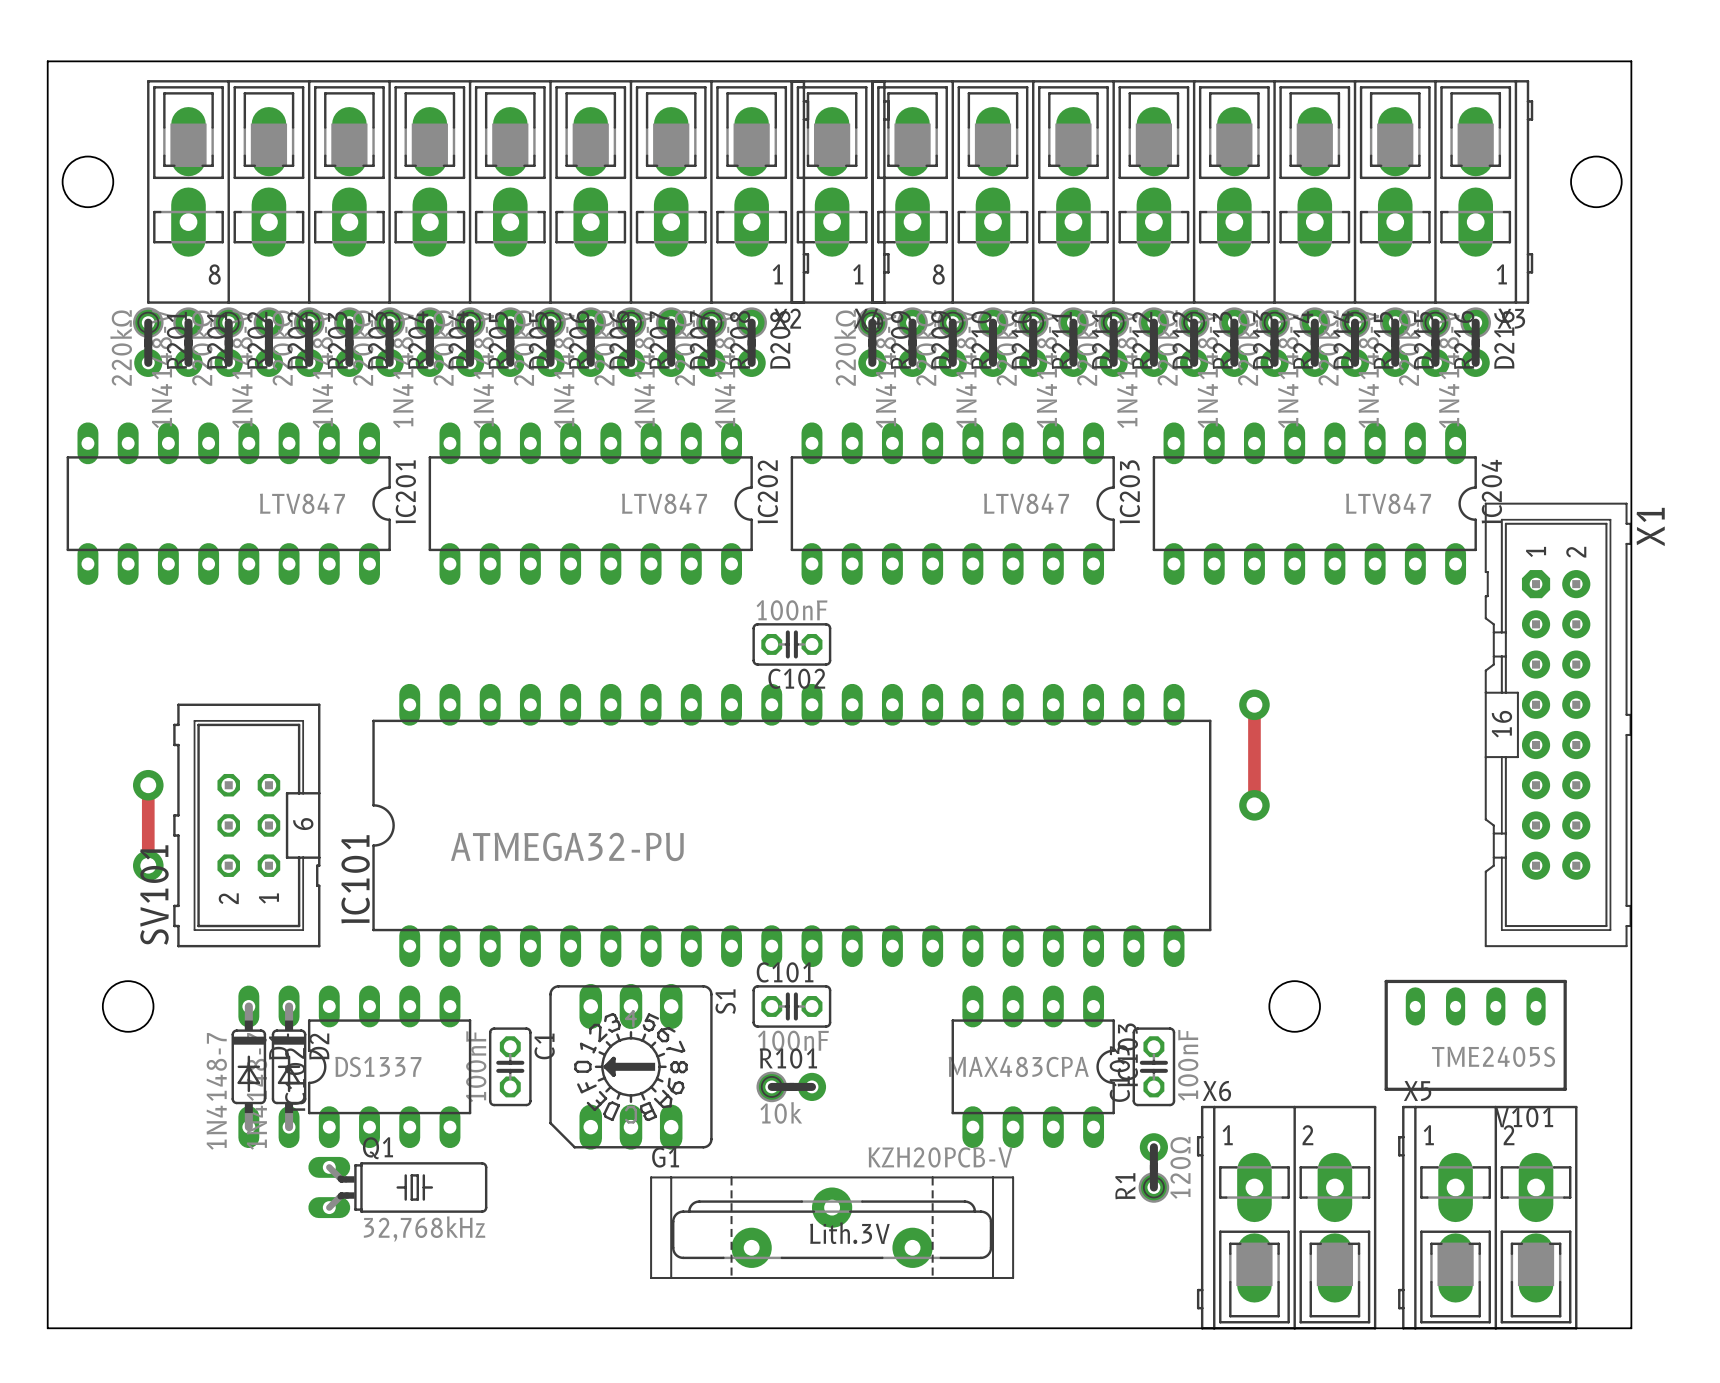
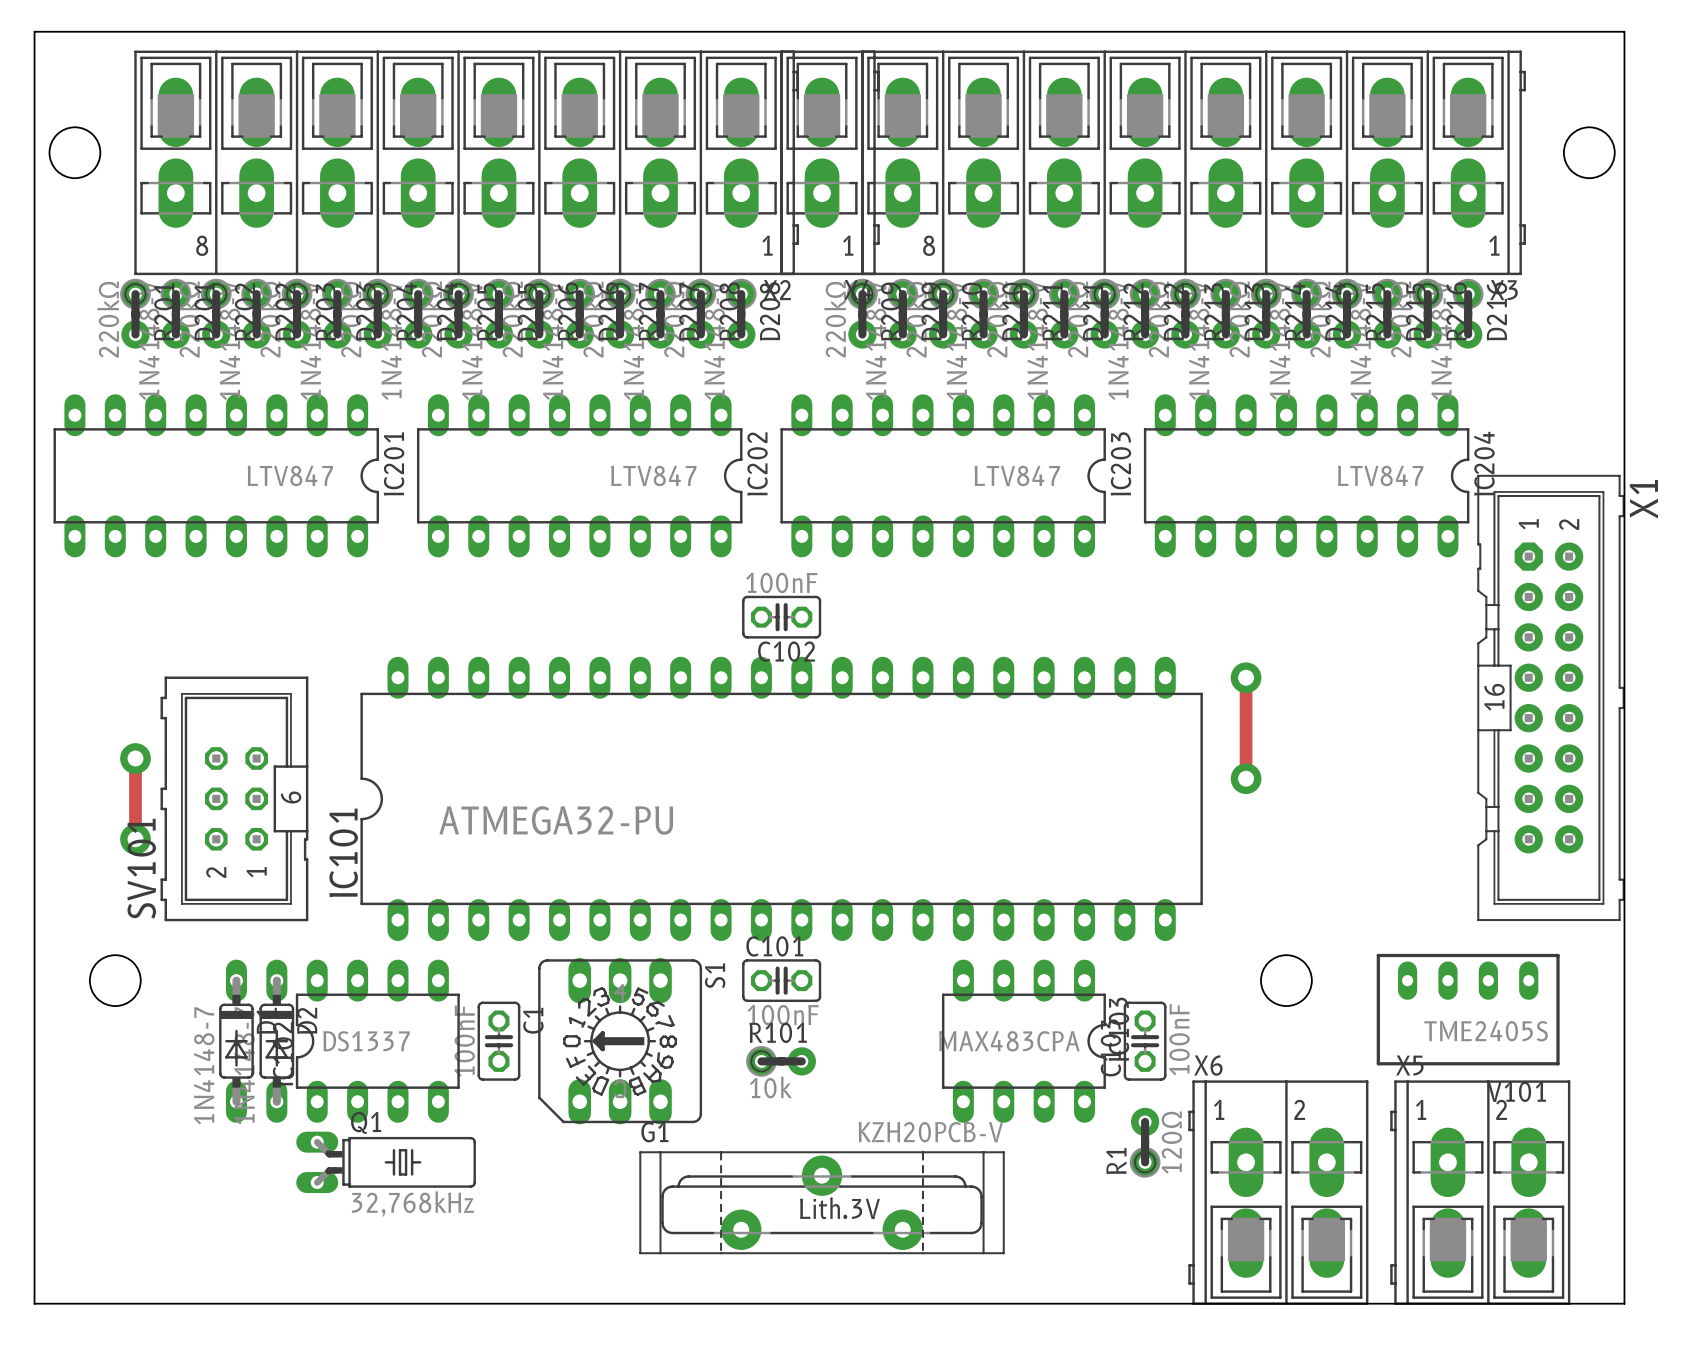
G1 footprint: [650, 1176, 1015, 1280] -> [639, 1151, 1005, 1255]

